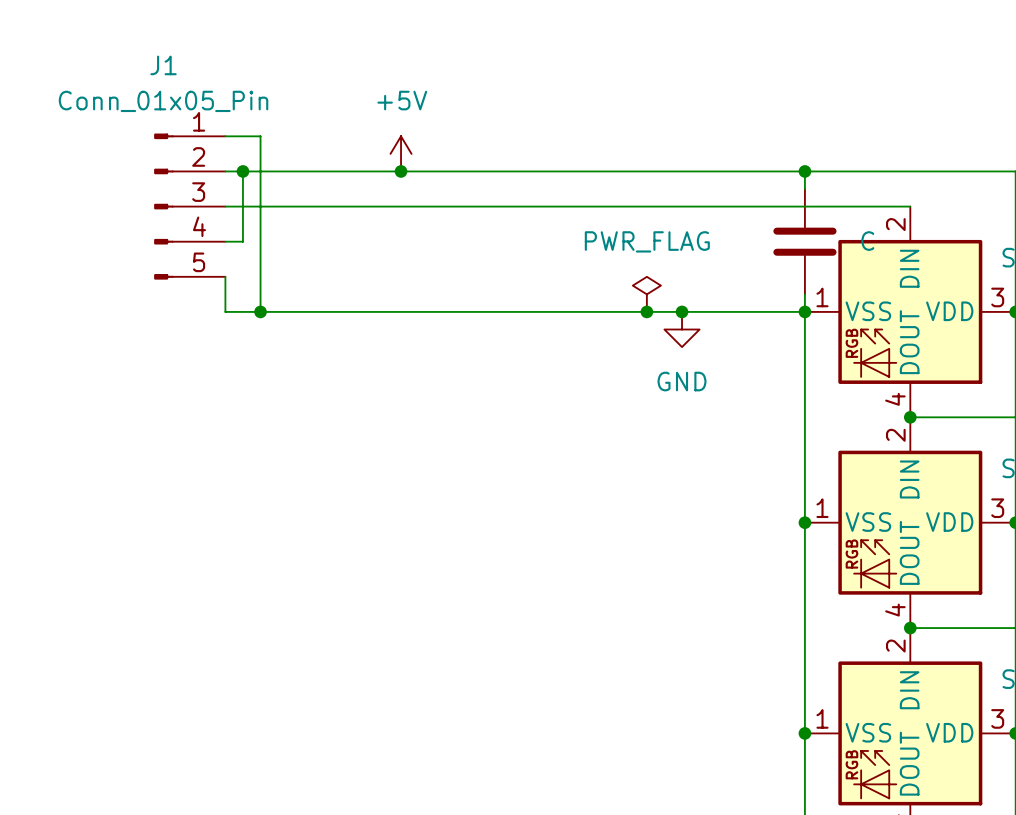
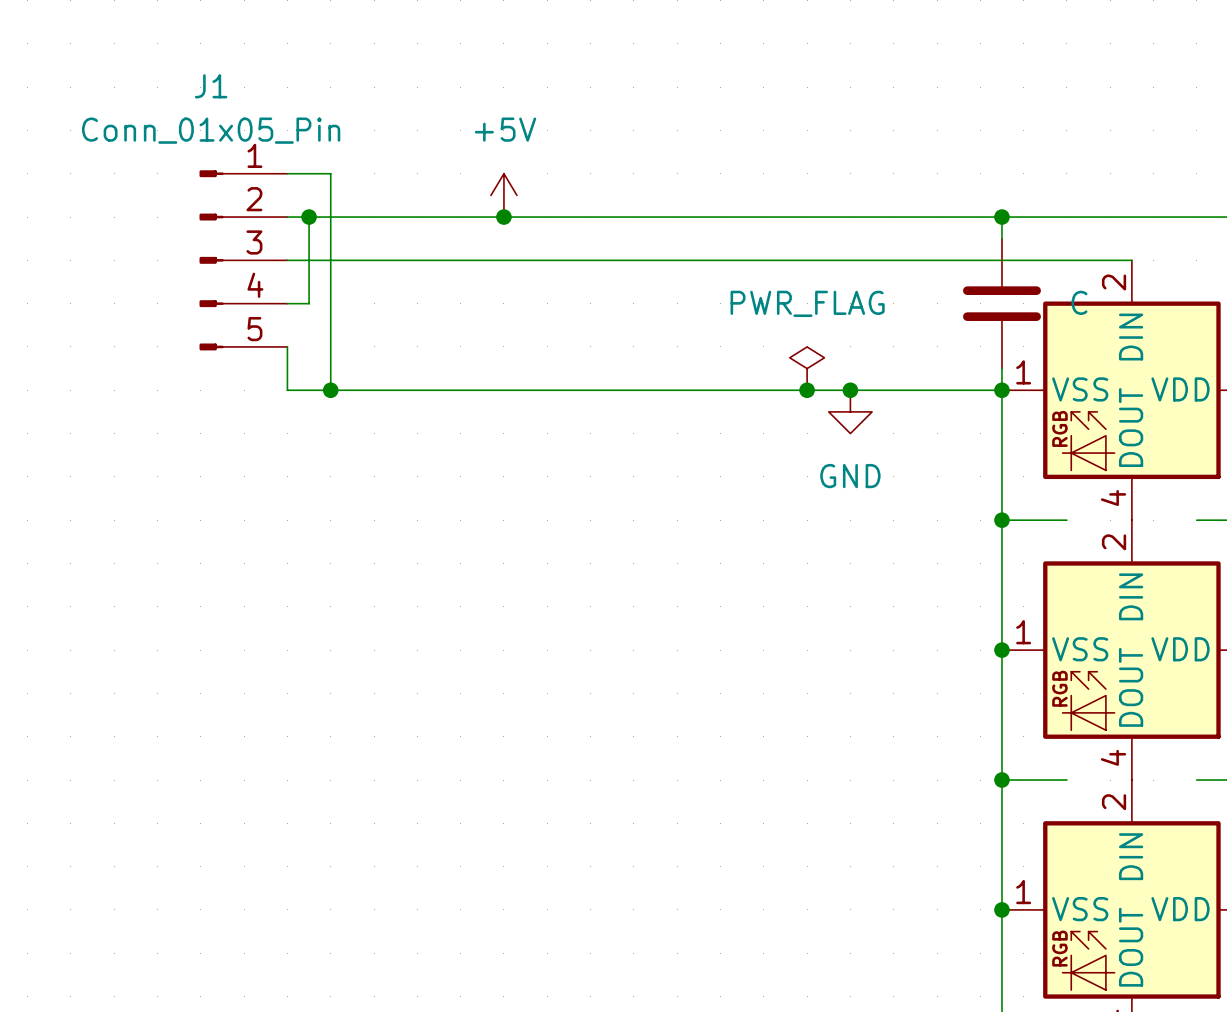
junction: none -> (1001, 520)
wire: (910, 417) (963, 417) -> (1001, 520) (1066, 520)
junction: (910, 417) -> none
junction: none -> (1001, 780)
wire: (910, 628) (963, 628) -> (1001, 780) (1066, 780)
junction: (910, 628) -> none

